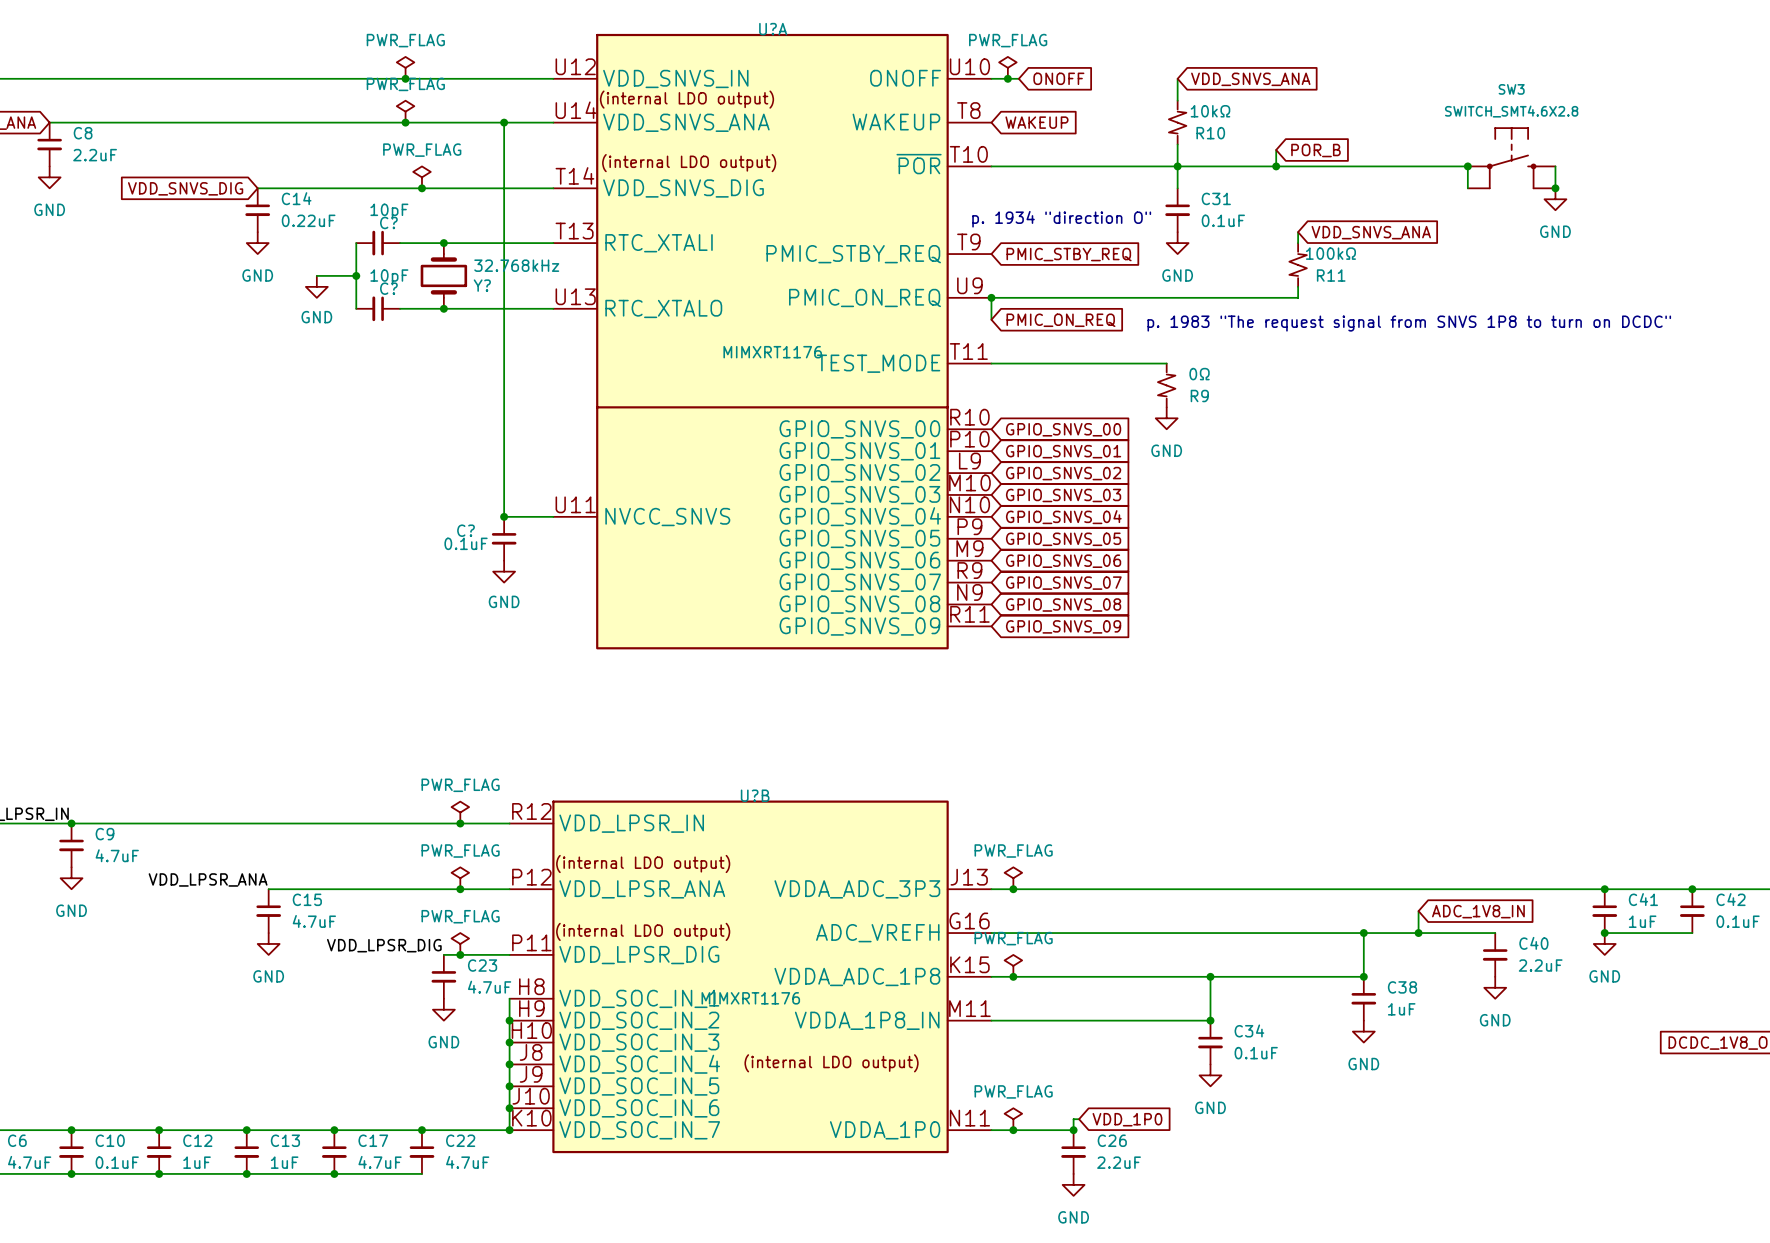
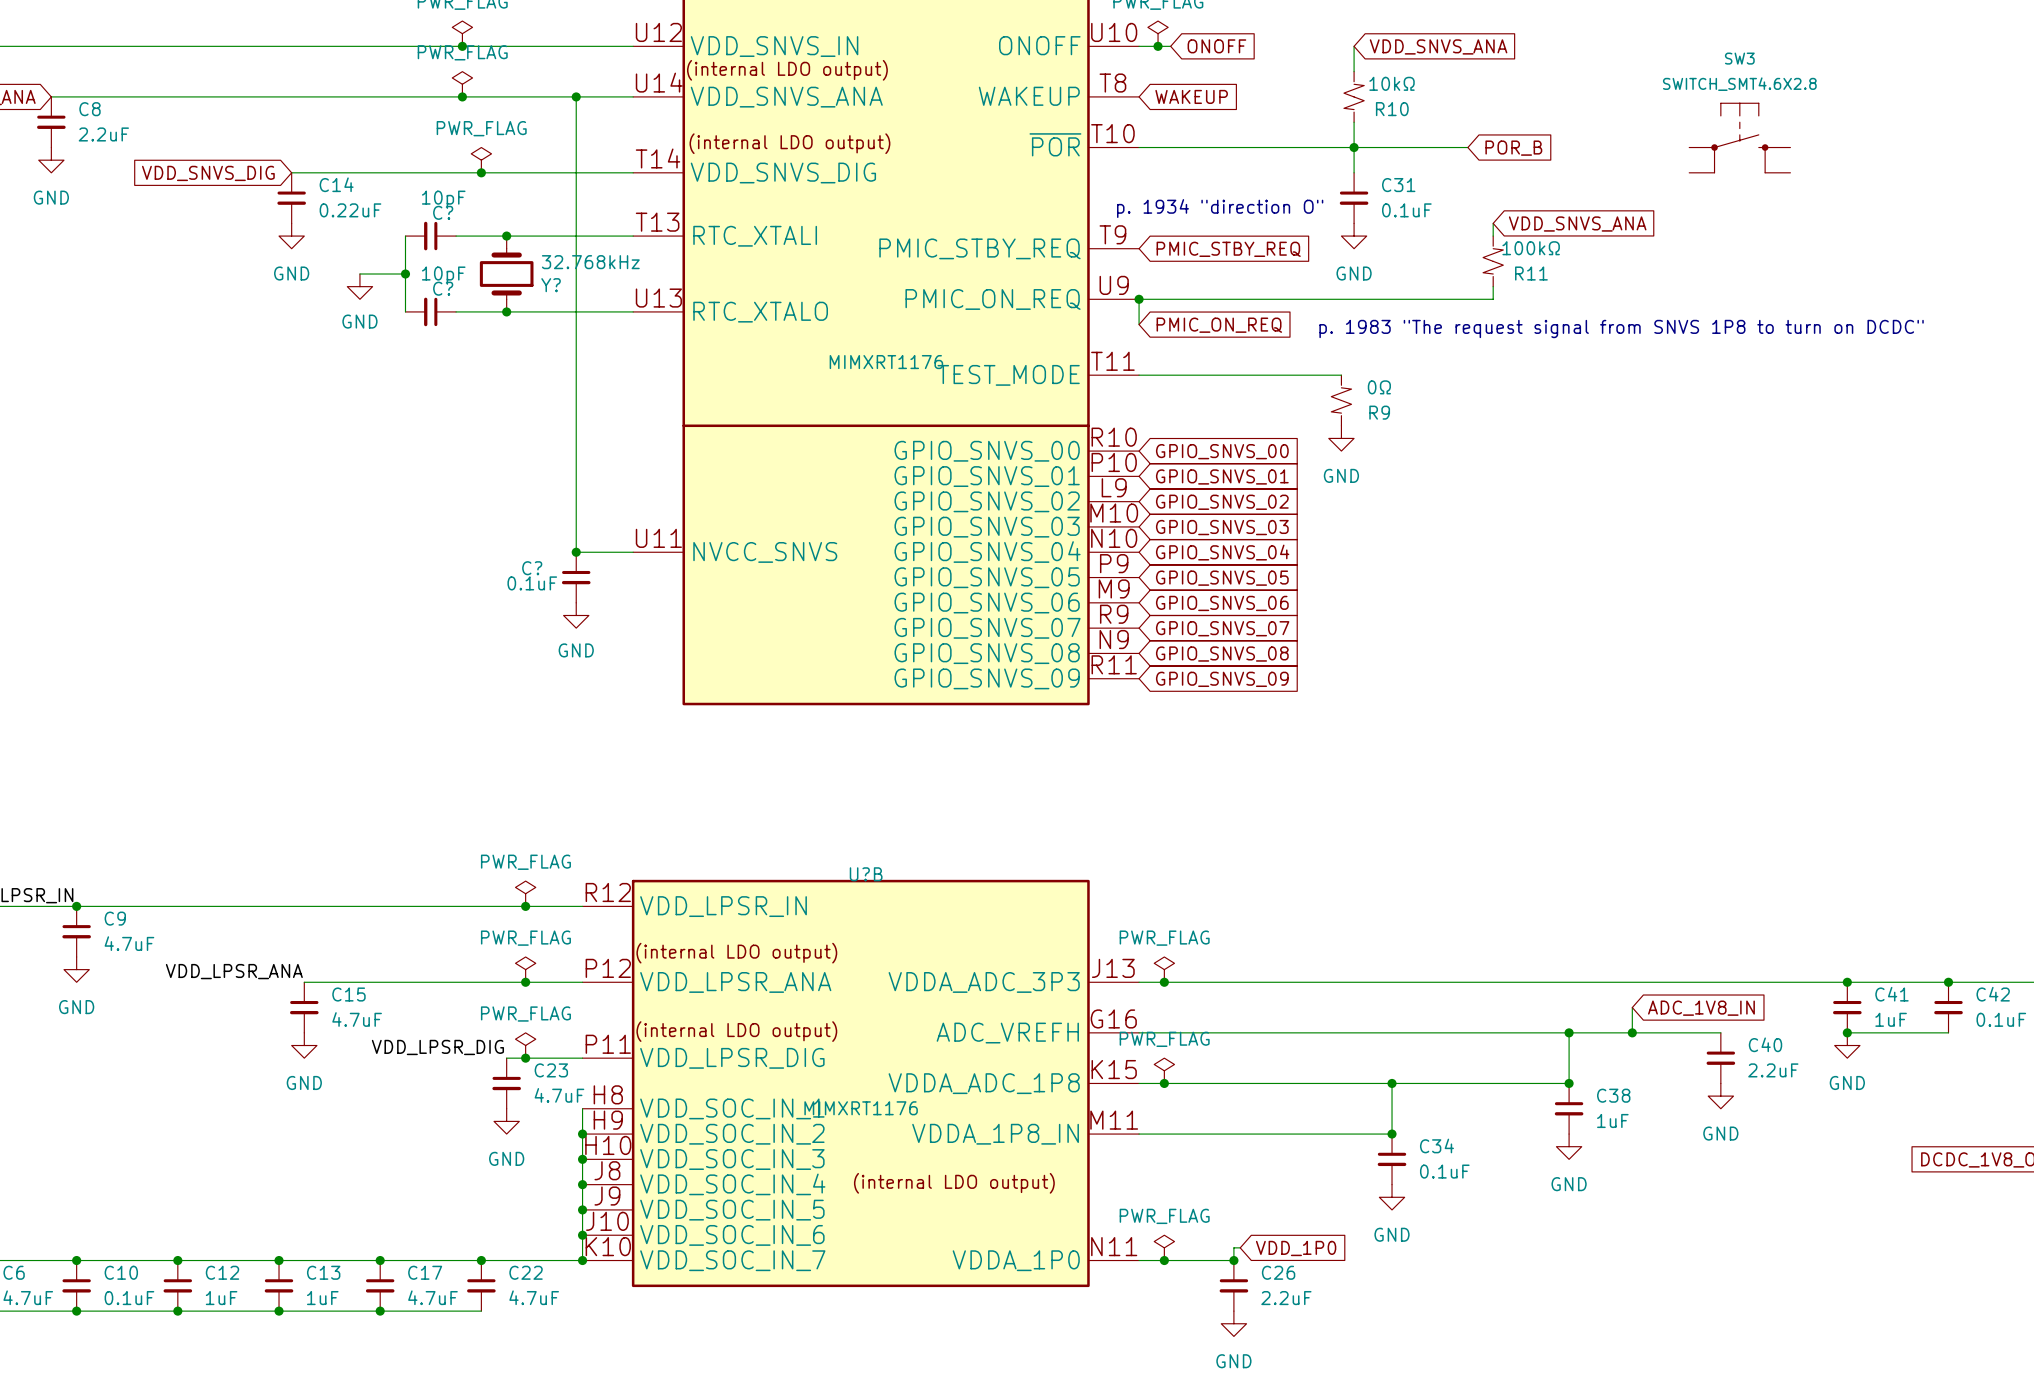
wire: (1276, 149) (1276, 166) (1467, 166) (1467, 188) -> none
global label position: POR_B (1315, 150) -> POR_B (1513, 148)
junction: (1276, 166) -> none
junction: (1467, 166) -> none
wire: (1555, 166) (1555, 188) -> none
junction: (1555, 188) -> none
power symbol: GND (1555, 199) -> none

